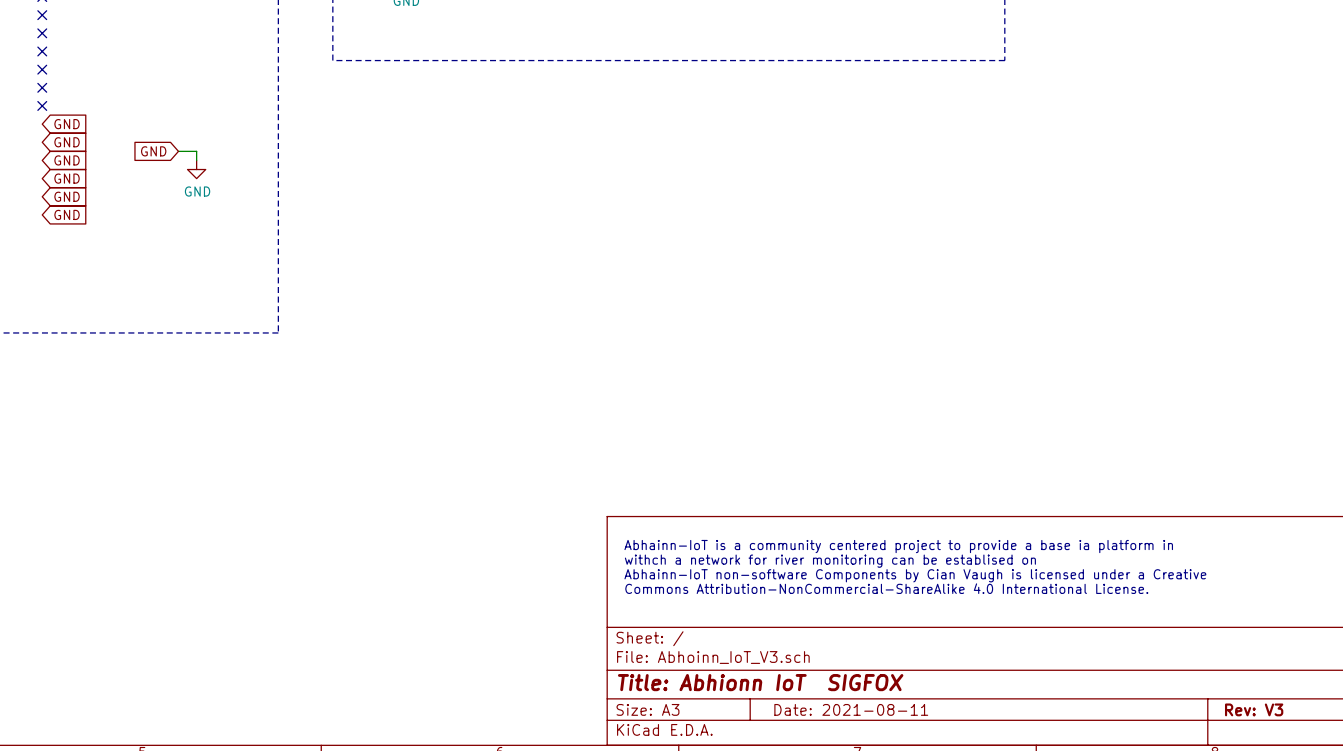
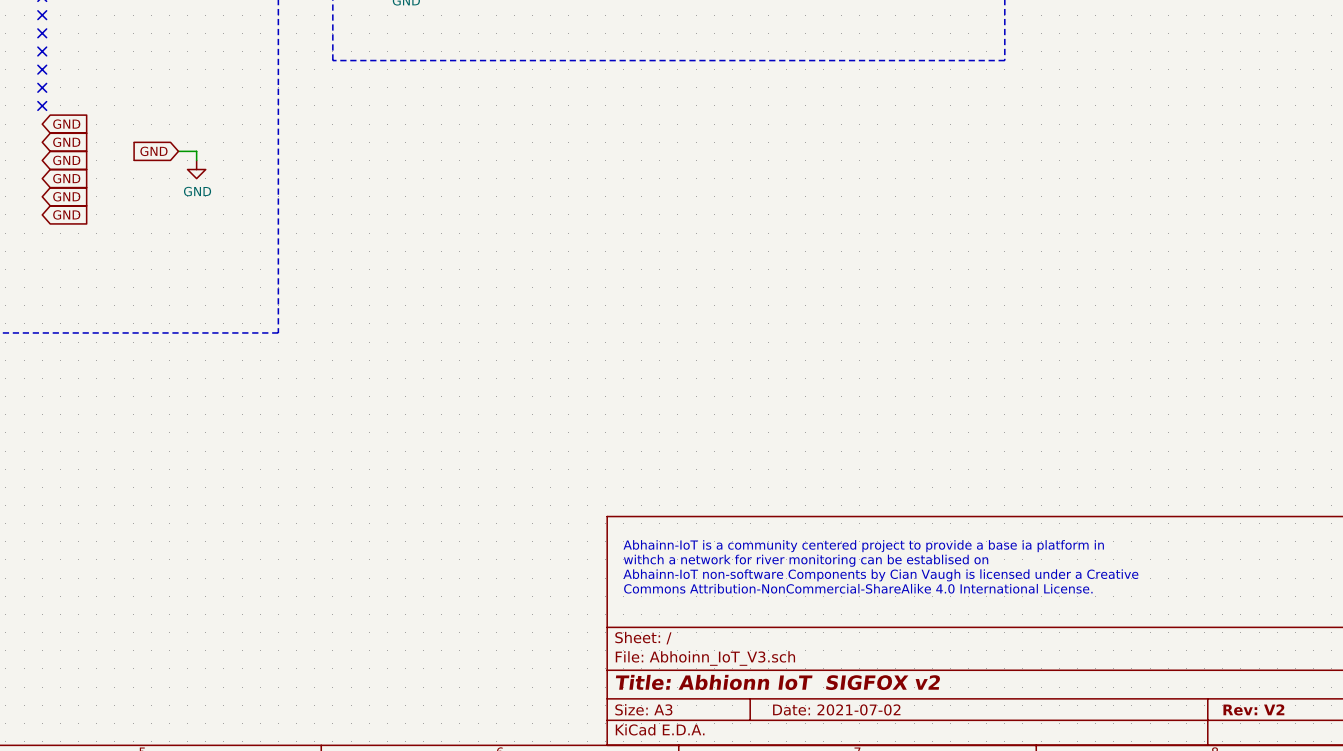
title block: Title: Abhionn IoT SIGFOX (760, 682) -> Title: Abhionn IoT SIGFOX v2 (778, 682)
title block: Date: 2021-08-11 (851, 709) -> Date: 2021-07-02 (836, 709)
title block: Rev: V3 (1254, 709) -> Rev: V2 (1253, 709)

